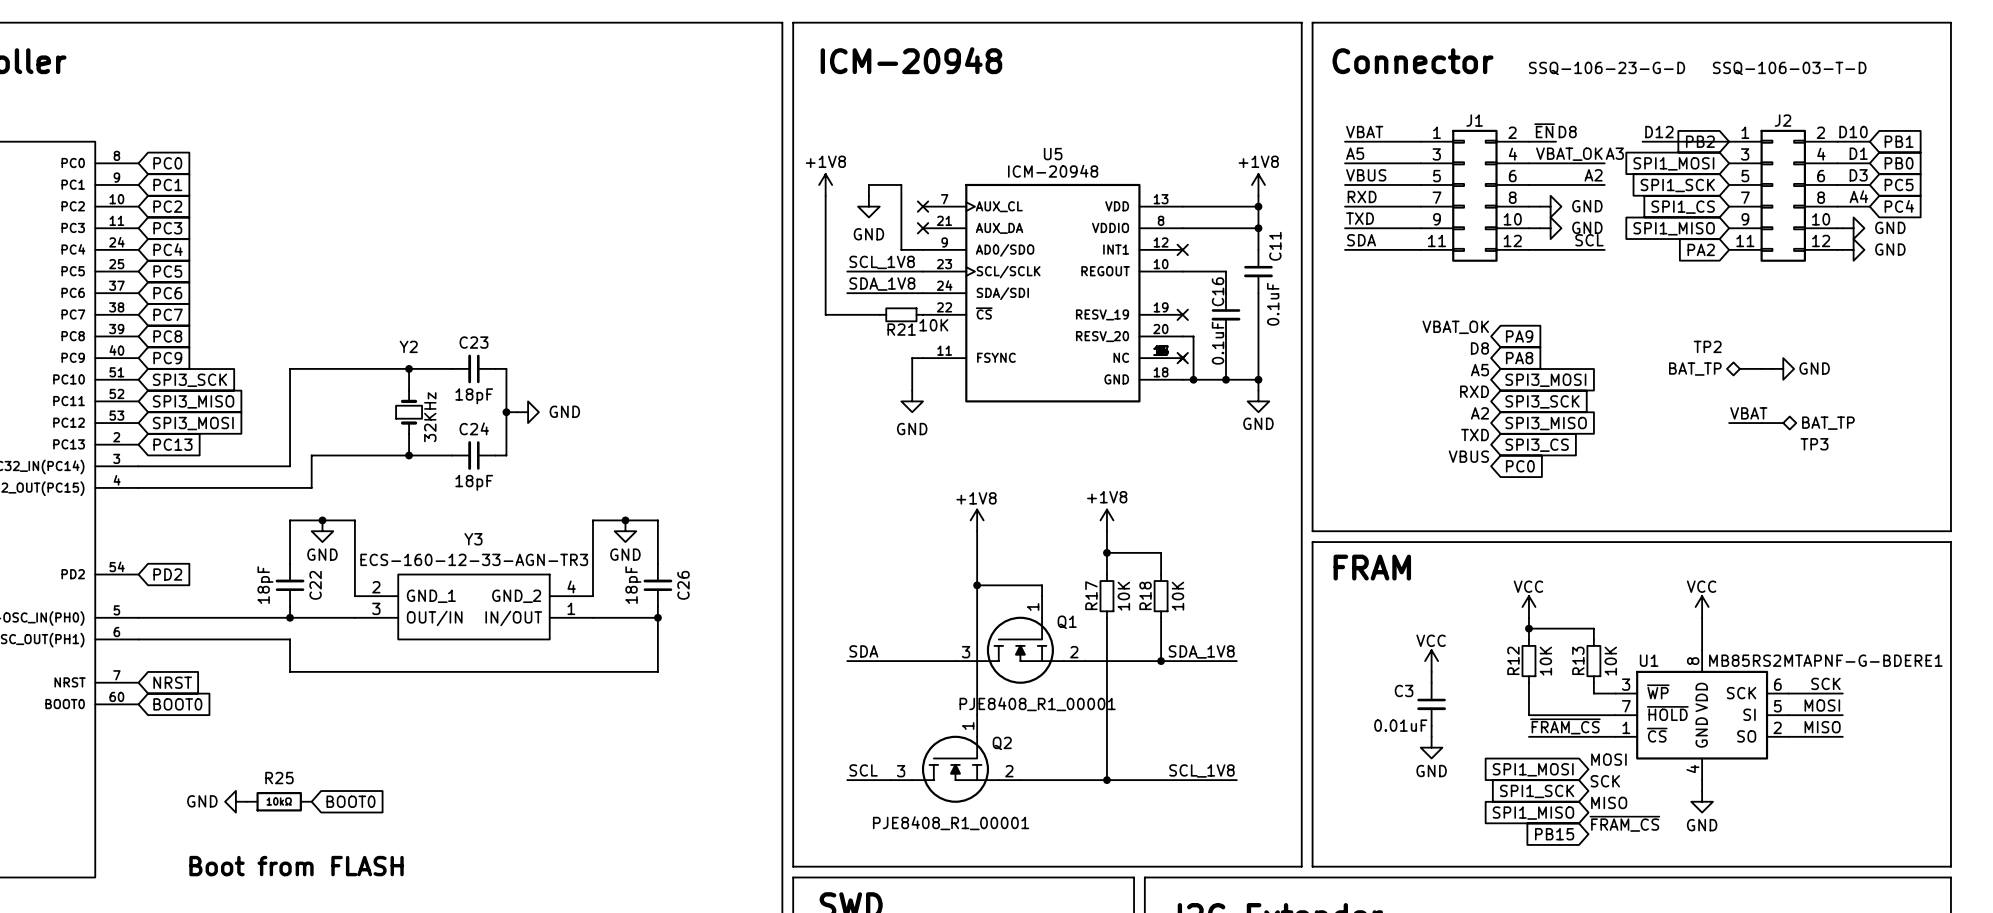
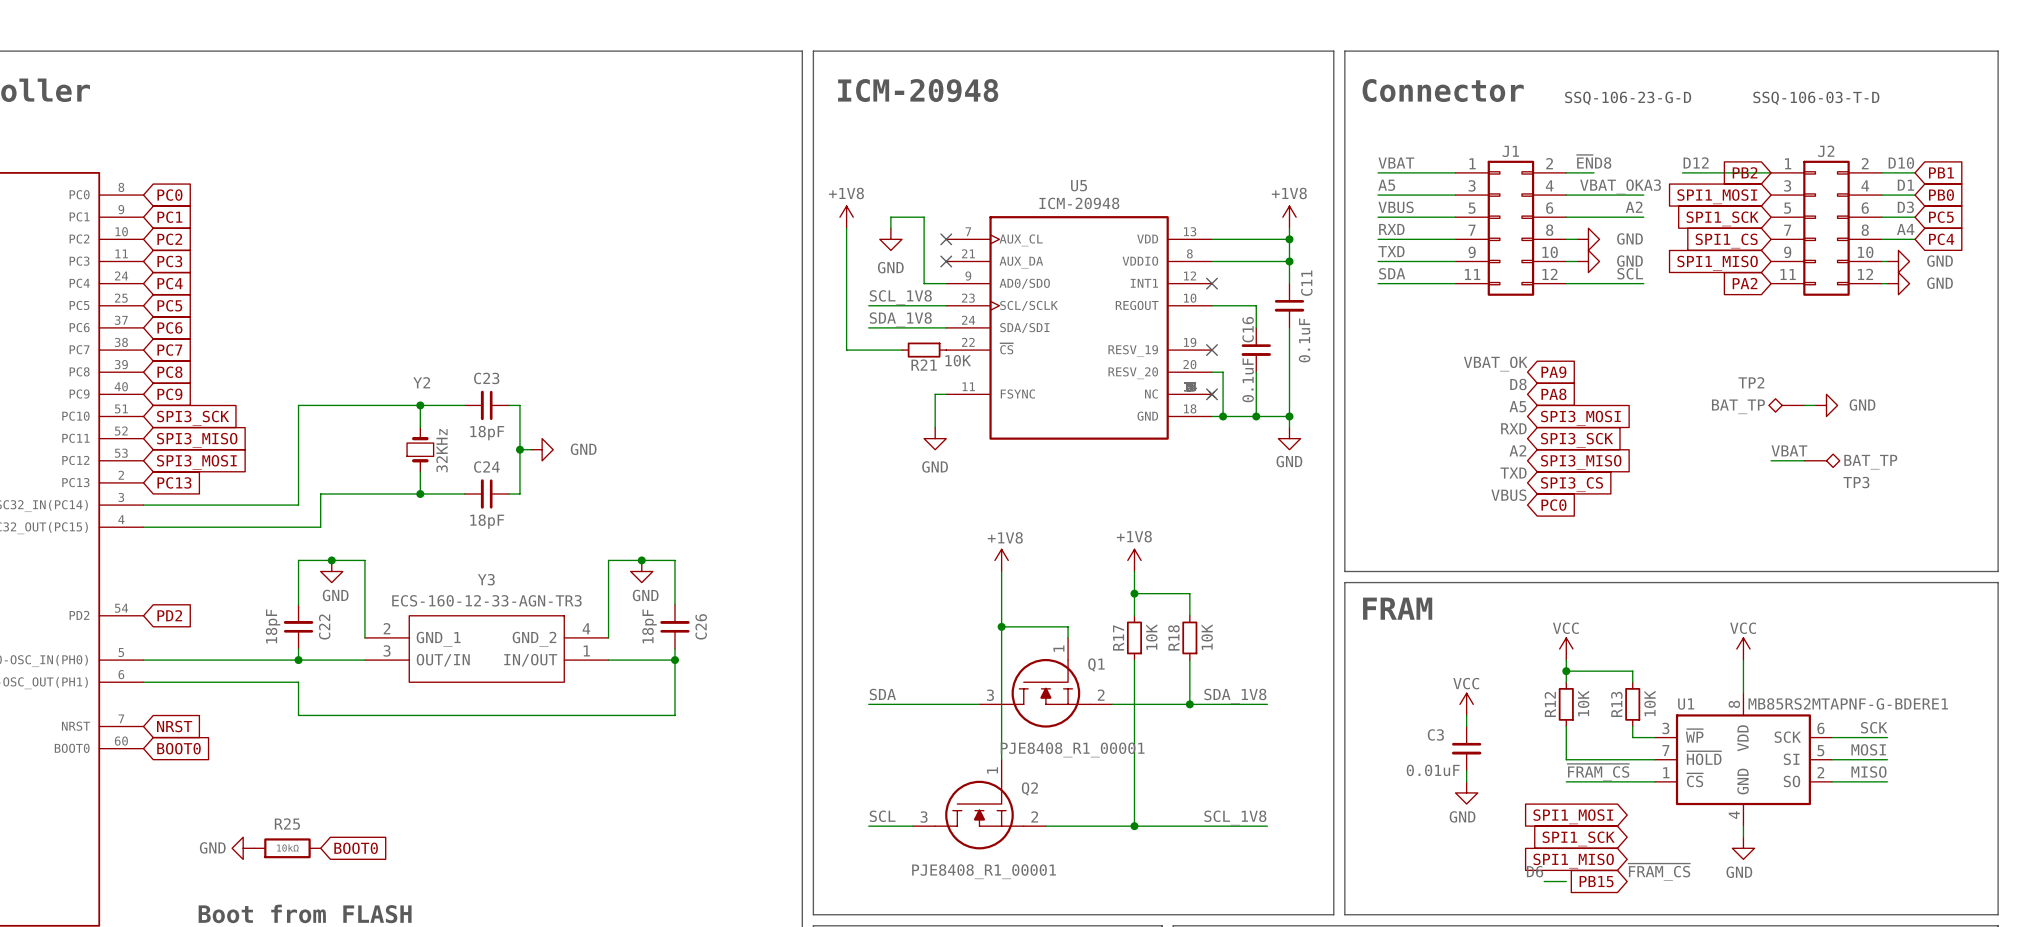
label: MOSI (1608, 759) -> none
label: SCK (1605, 781) -> none
label: MISO (1609, 802) -> none
label: none -> D6 (1535, 871)
wire: none -> (1544, 881) (1566, 881)

